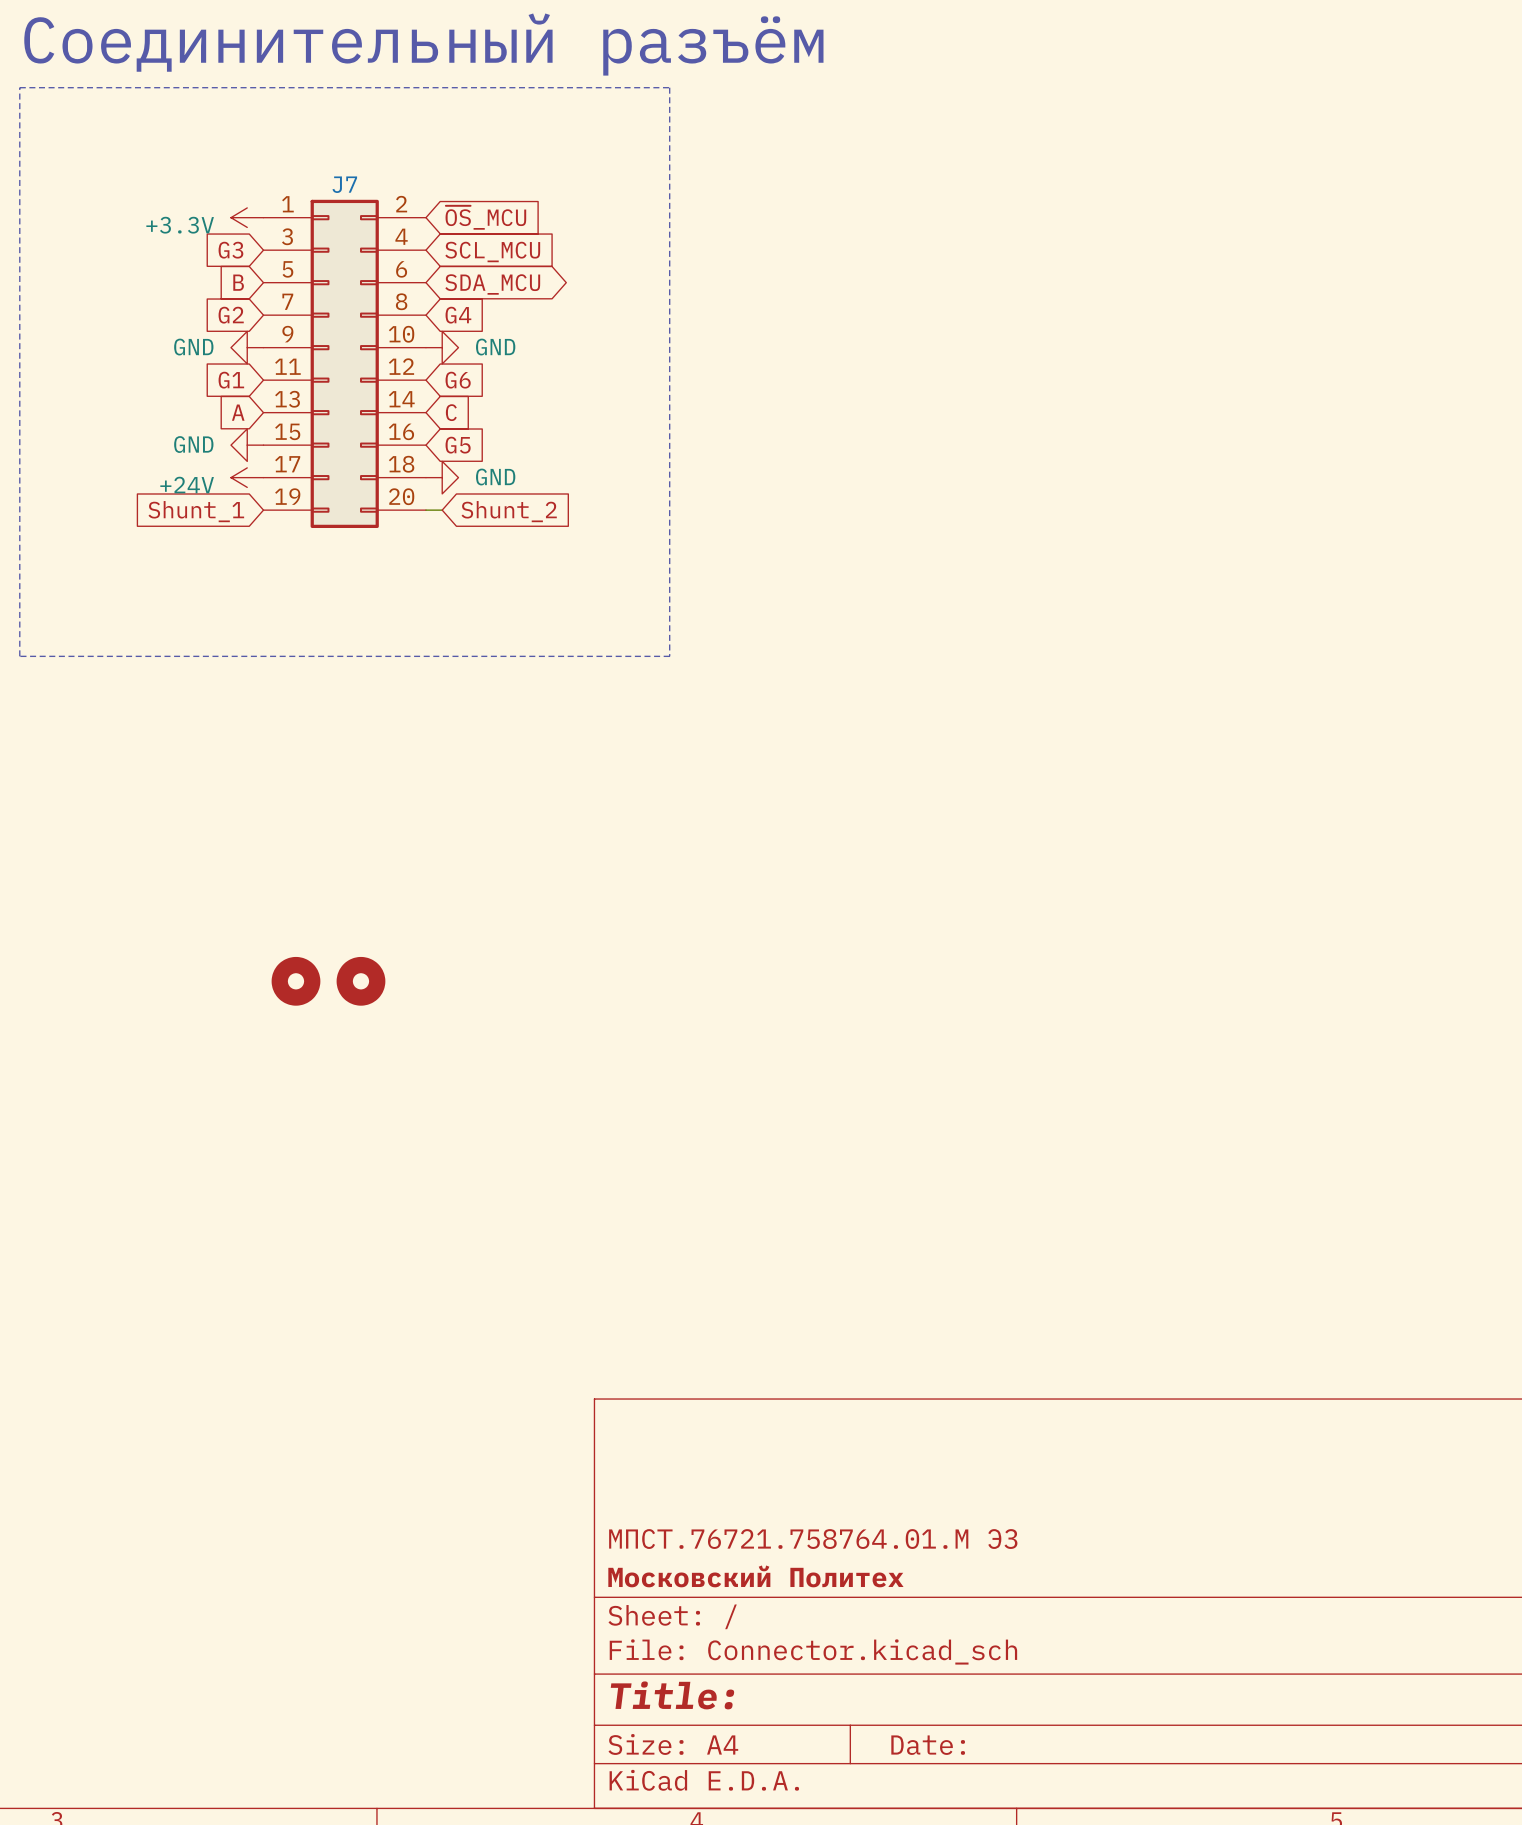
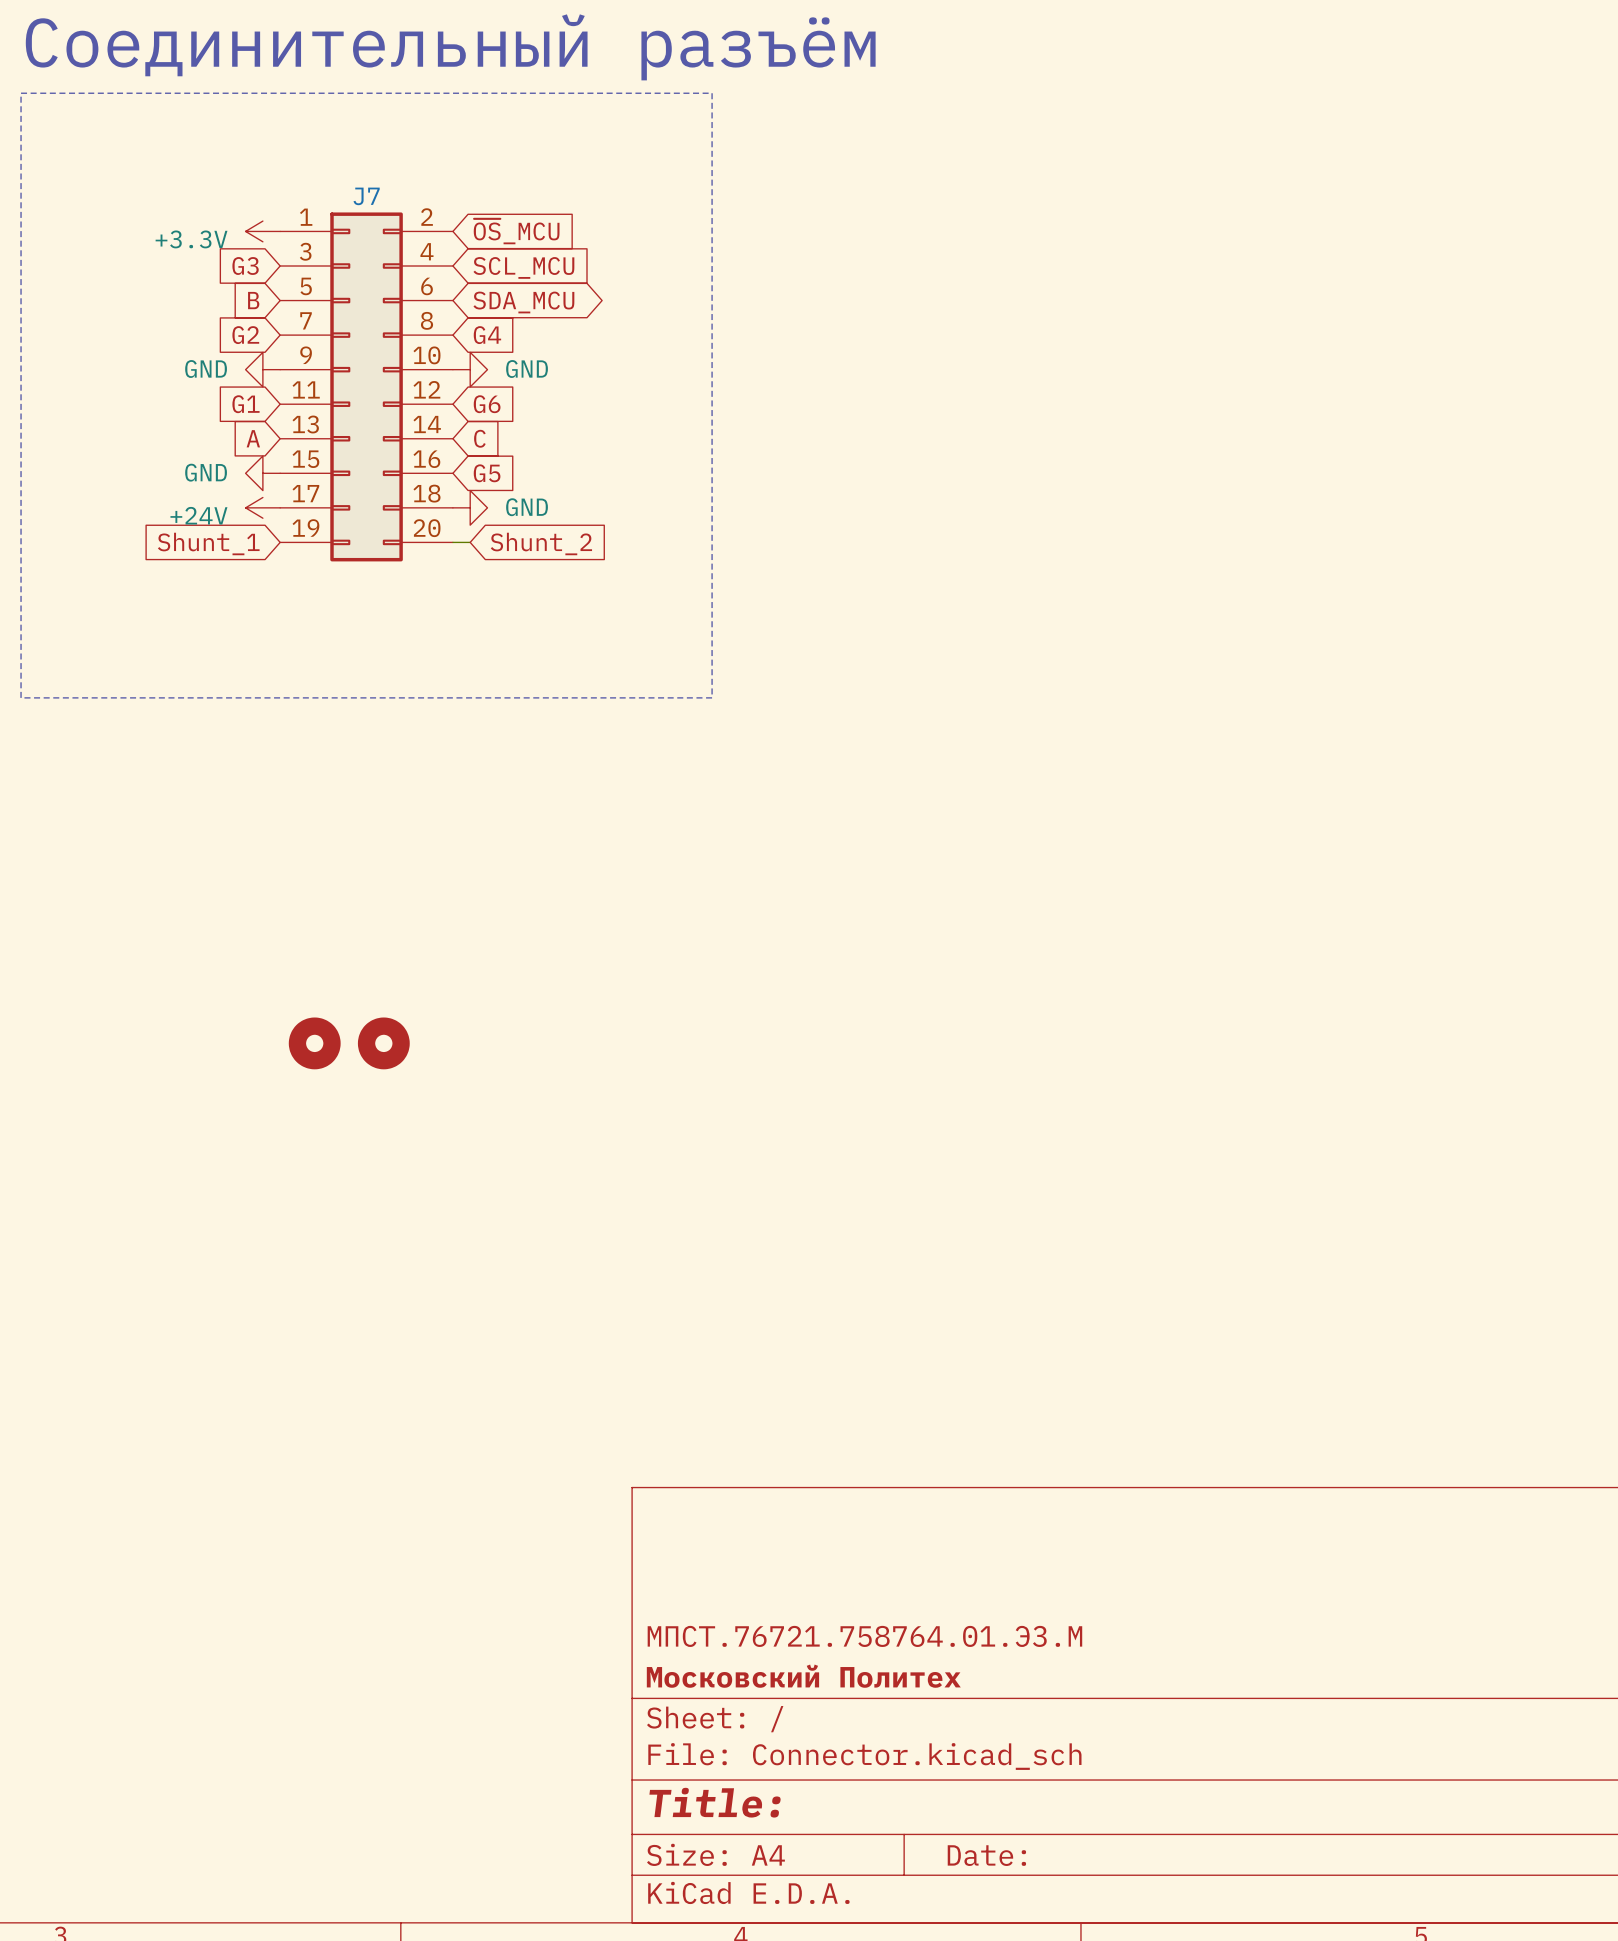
title block: МПСТ.76721.758764.01.М Э3 (813, 1539) -> МПСТ.76721.758764.01.Э3.М (864, 1636)

